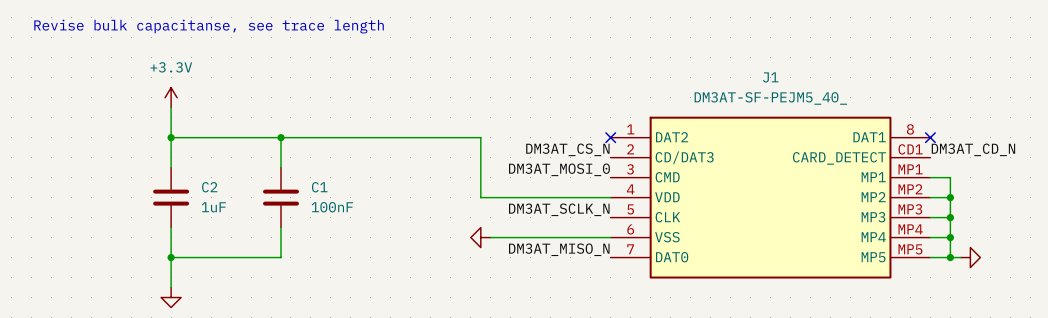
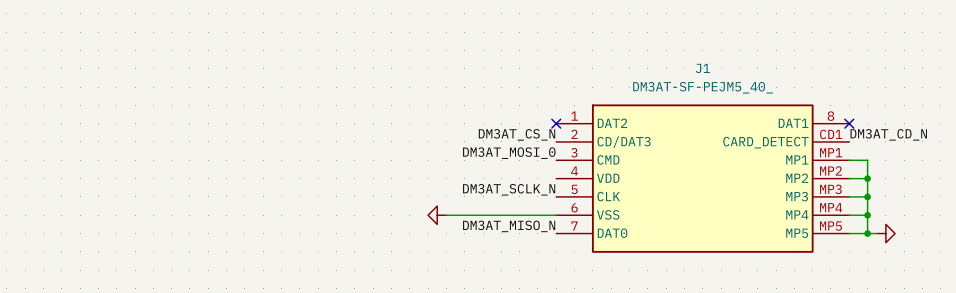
text: Revise bulk capacitanse, see trace length (209, 26) -> none
power symbol: +3.3V (171, 97) -> none
wire: (171, 107) (171, 167) -> none
wire: (171, 137) (480, 137) (480, 197) (610, 197) -> none
junction: (171, 137) -> none
wire: (281, 137) (281, 167) -> none
junction: (281, 137) -> none
C2: 1uF (171, 197) -> none
C1: 100nF (281, 197) -> none
wire: (171, 227) (171, 287) -> none
wire: (281, 227) (281, 257) (171, 257) -> none
junction: (171, 257) -> none
power symbol: (171, 297) -> none

